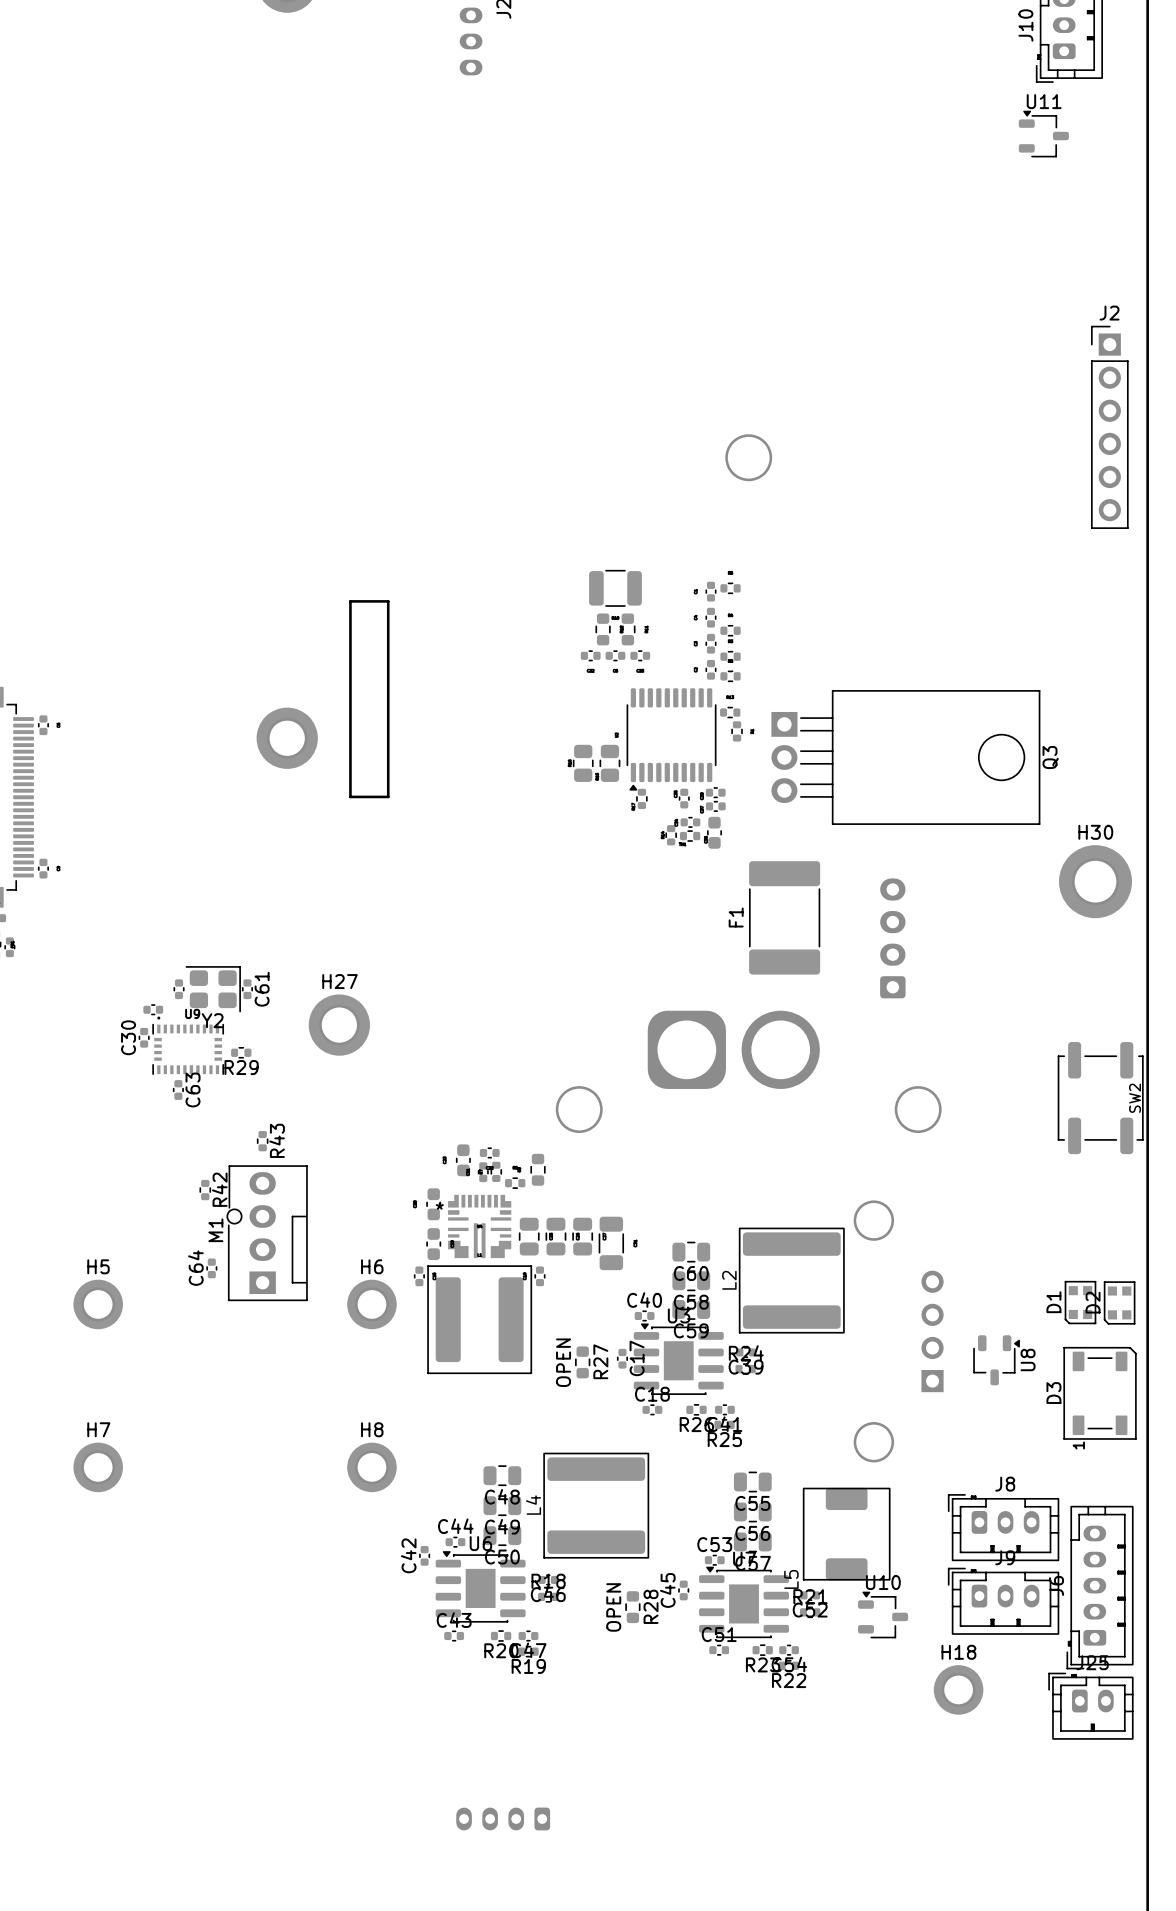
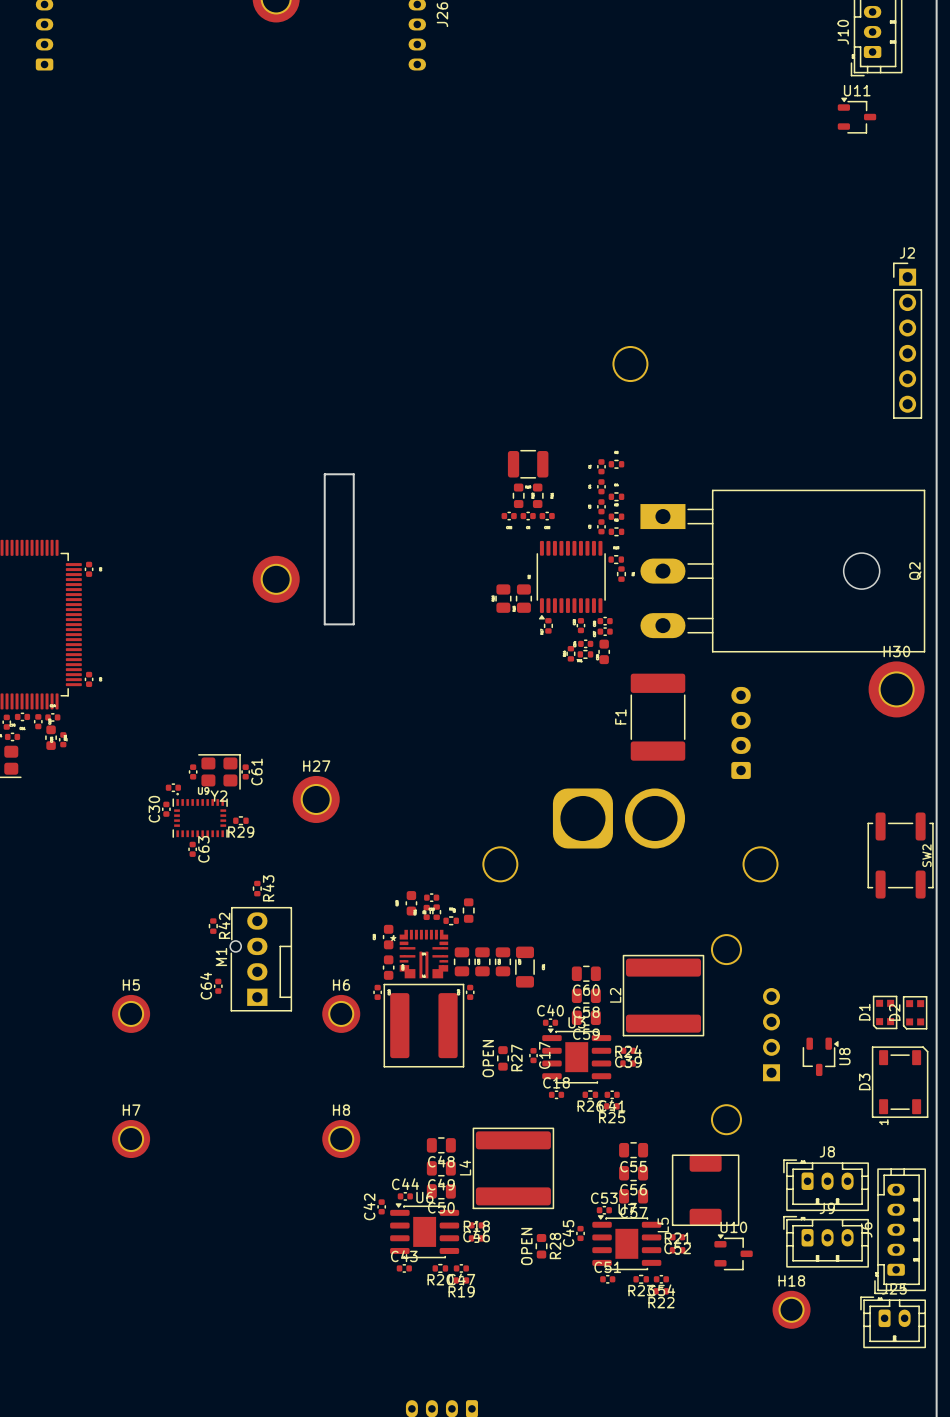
Q2: none -> (782, 571)
Q3: (905, 757) -> none

